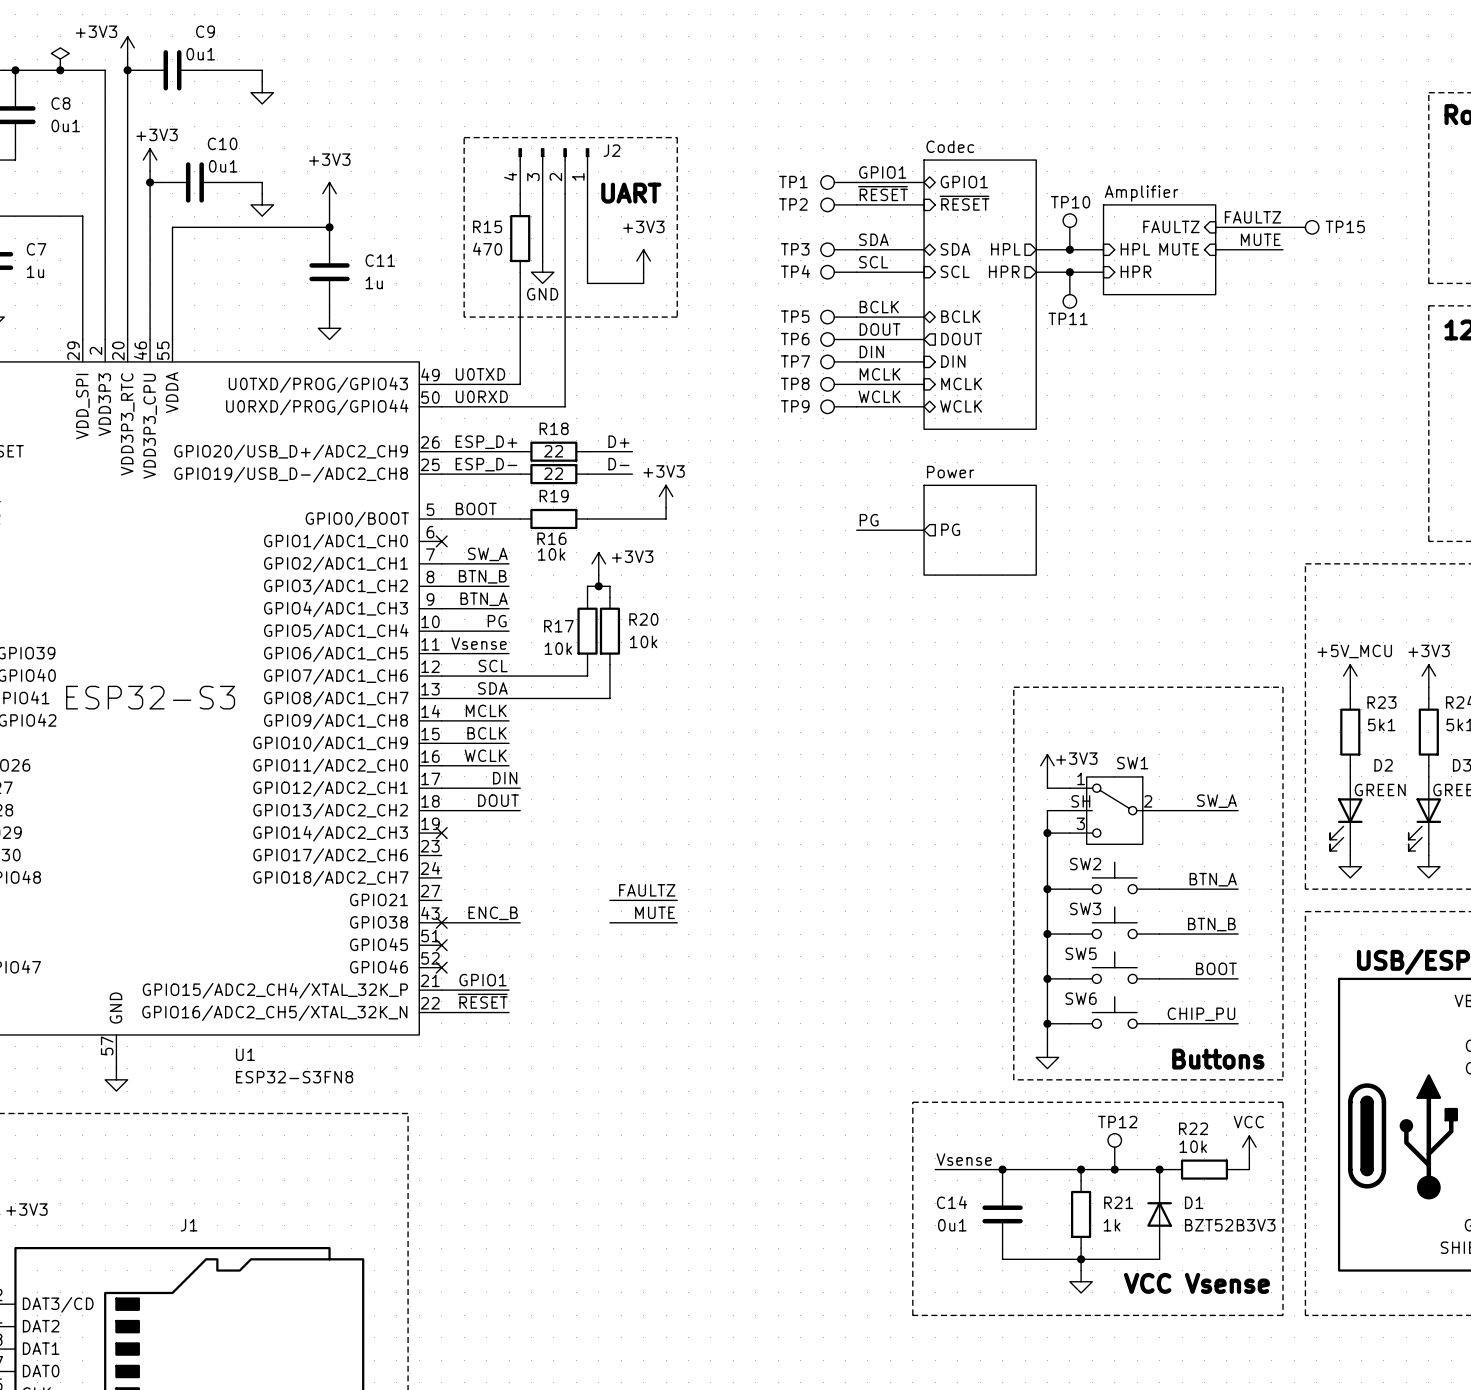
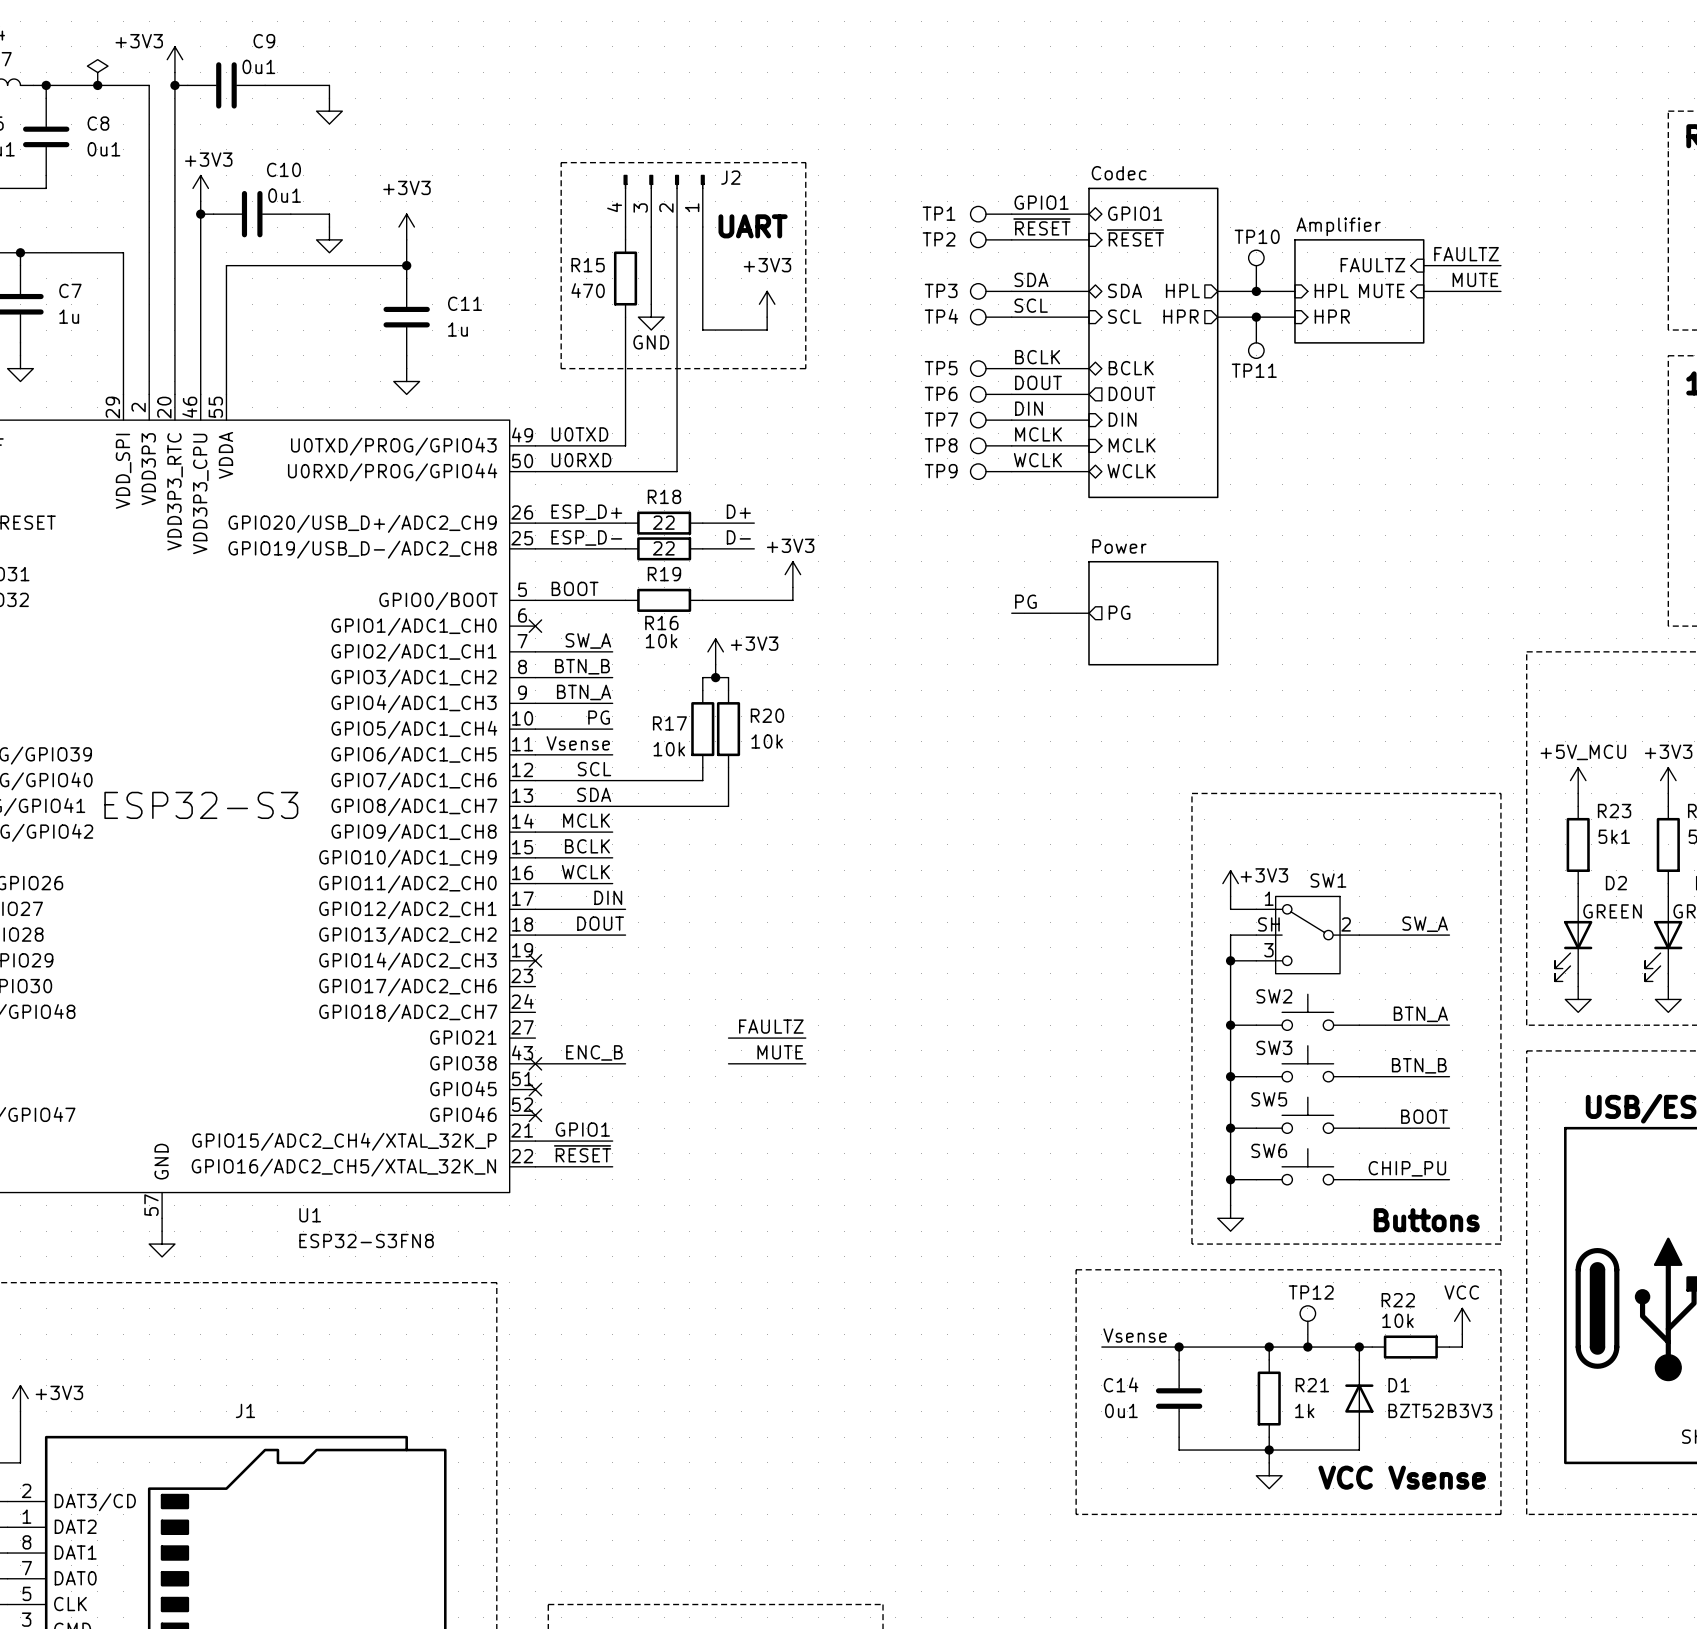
TP15: (1300, 227) -> none

